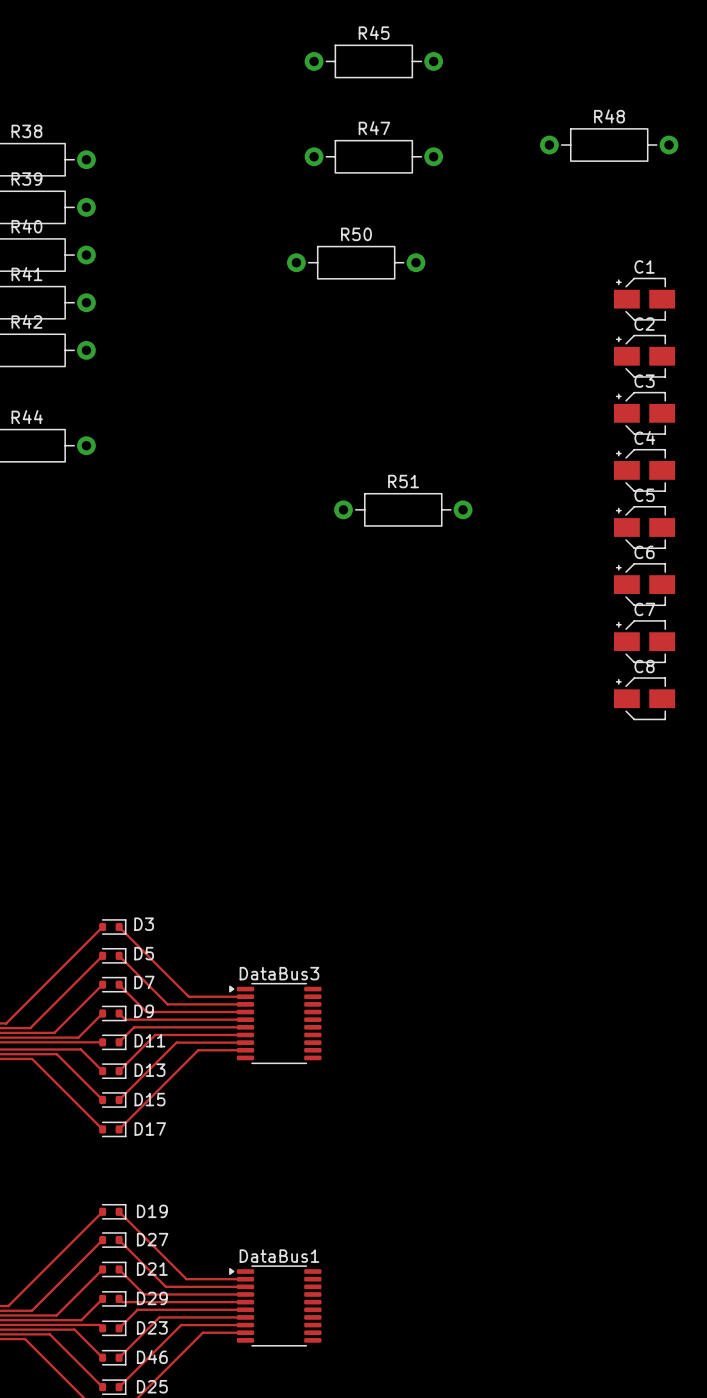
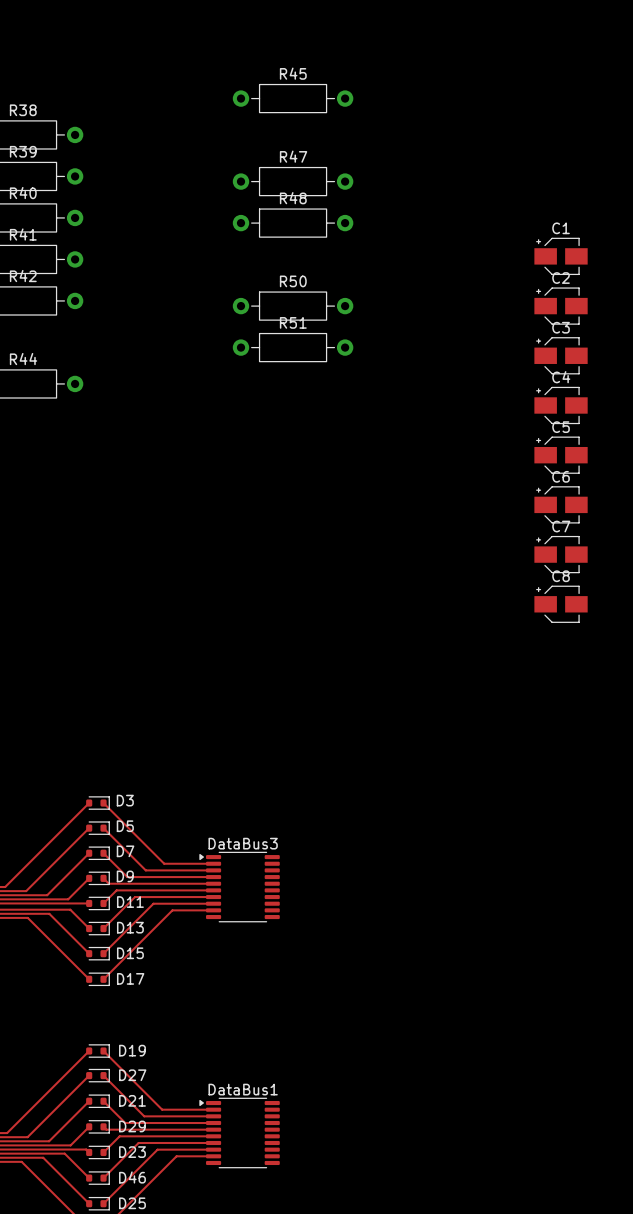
R45 position: (373, 61) -> (293, 98)
R48 position: (609, 145) -> (293, 223)
R47 position: (373, 156) -> (293, 181)
R50 position: (356, 262) -> (293, 306)
R51 position: (403, 509) -> (293, 347)

